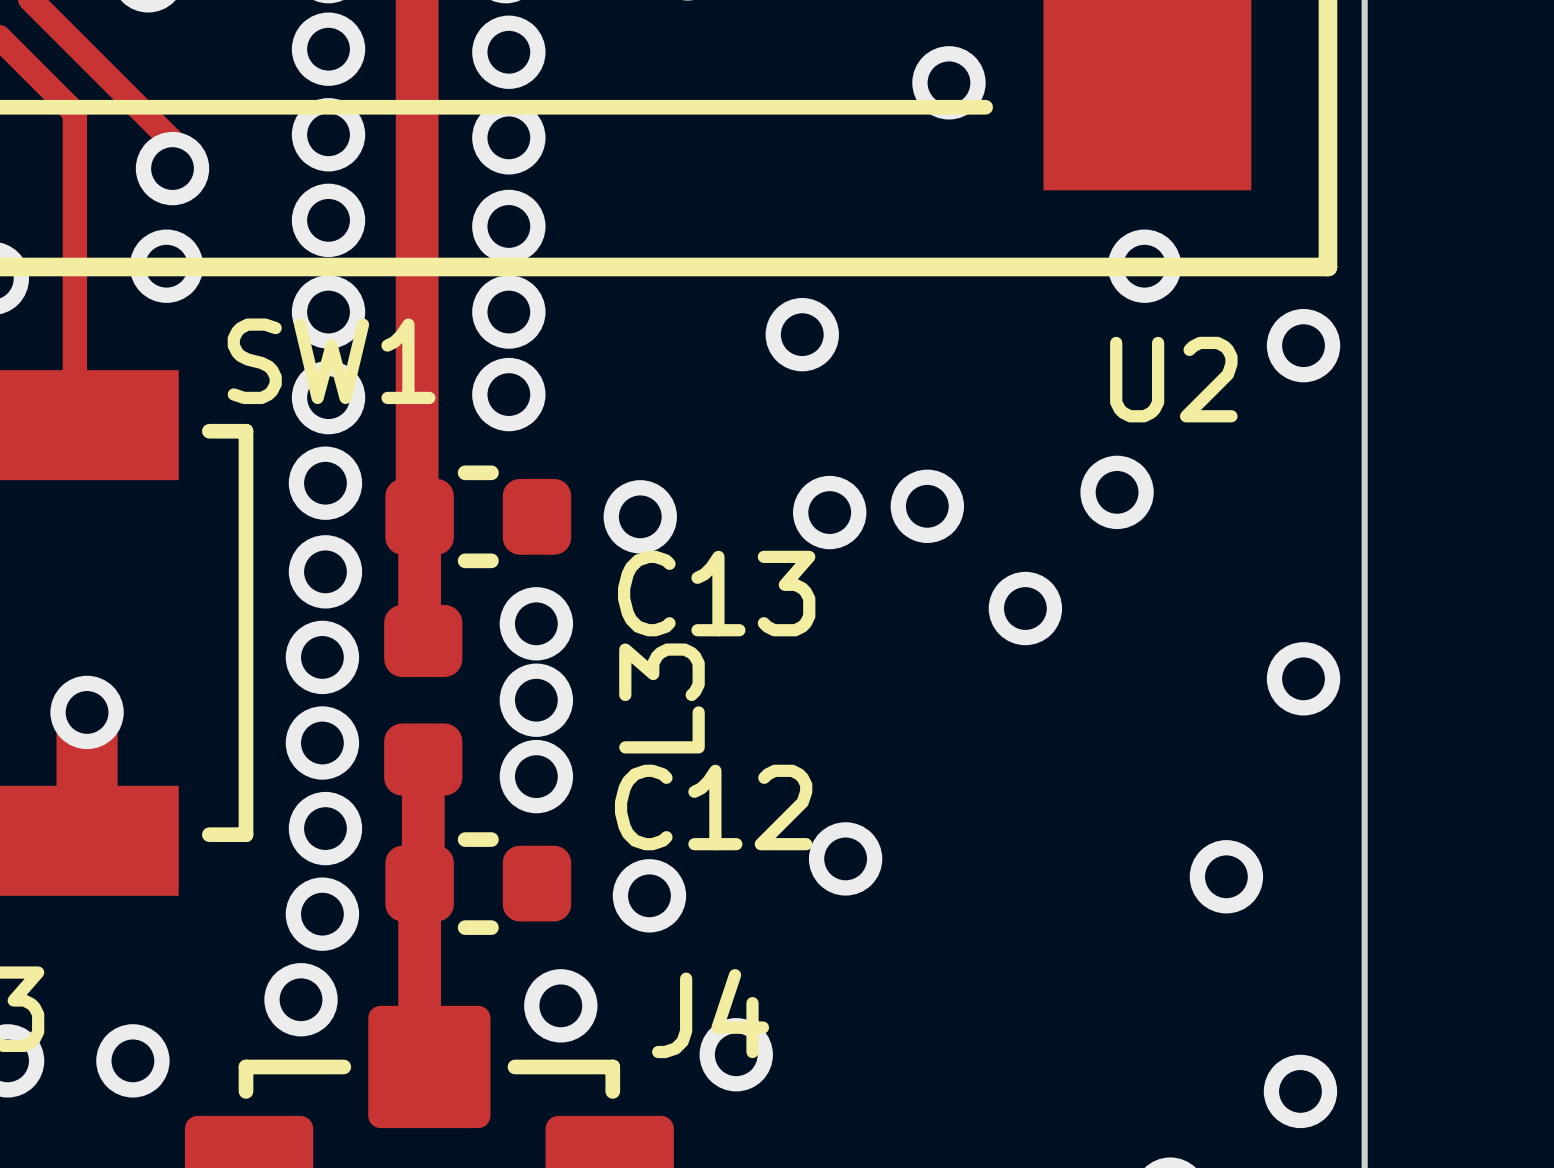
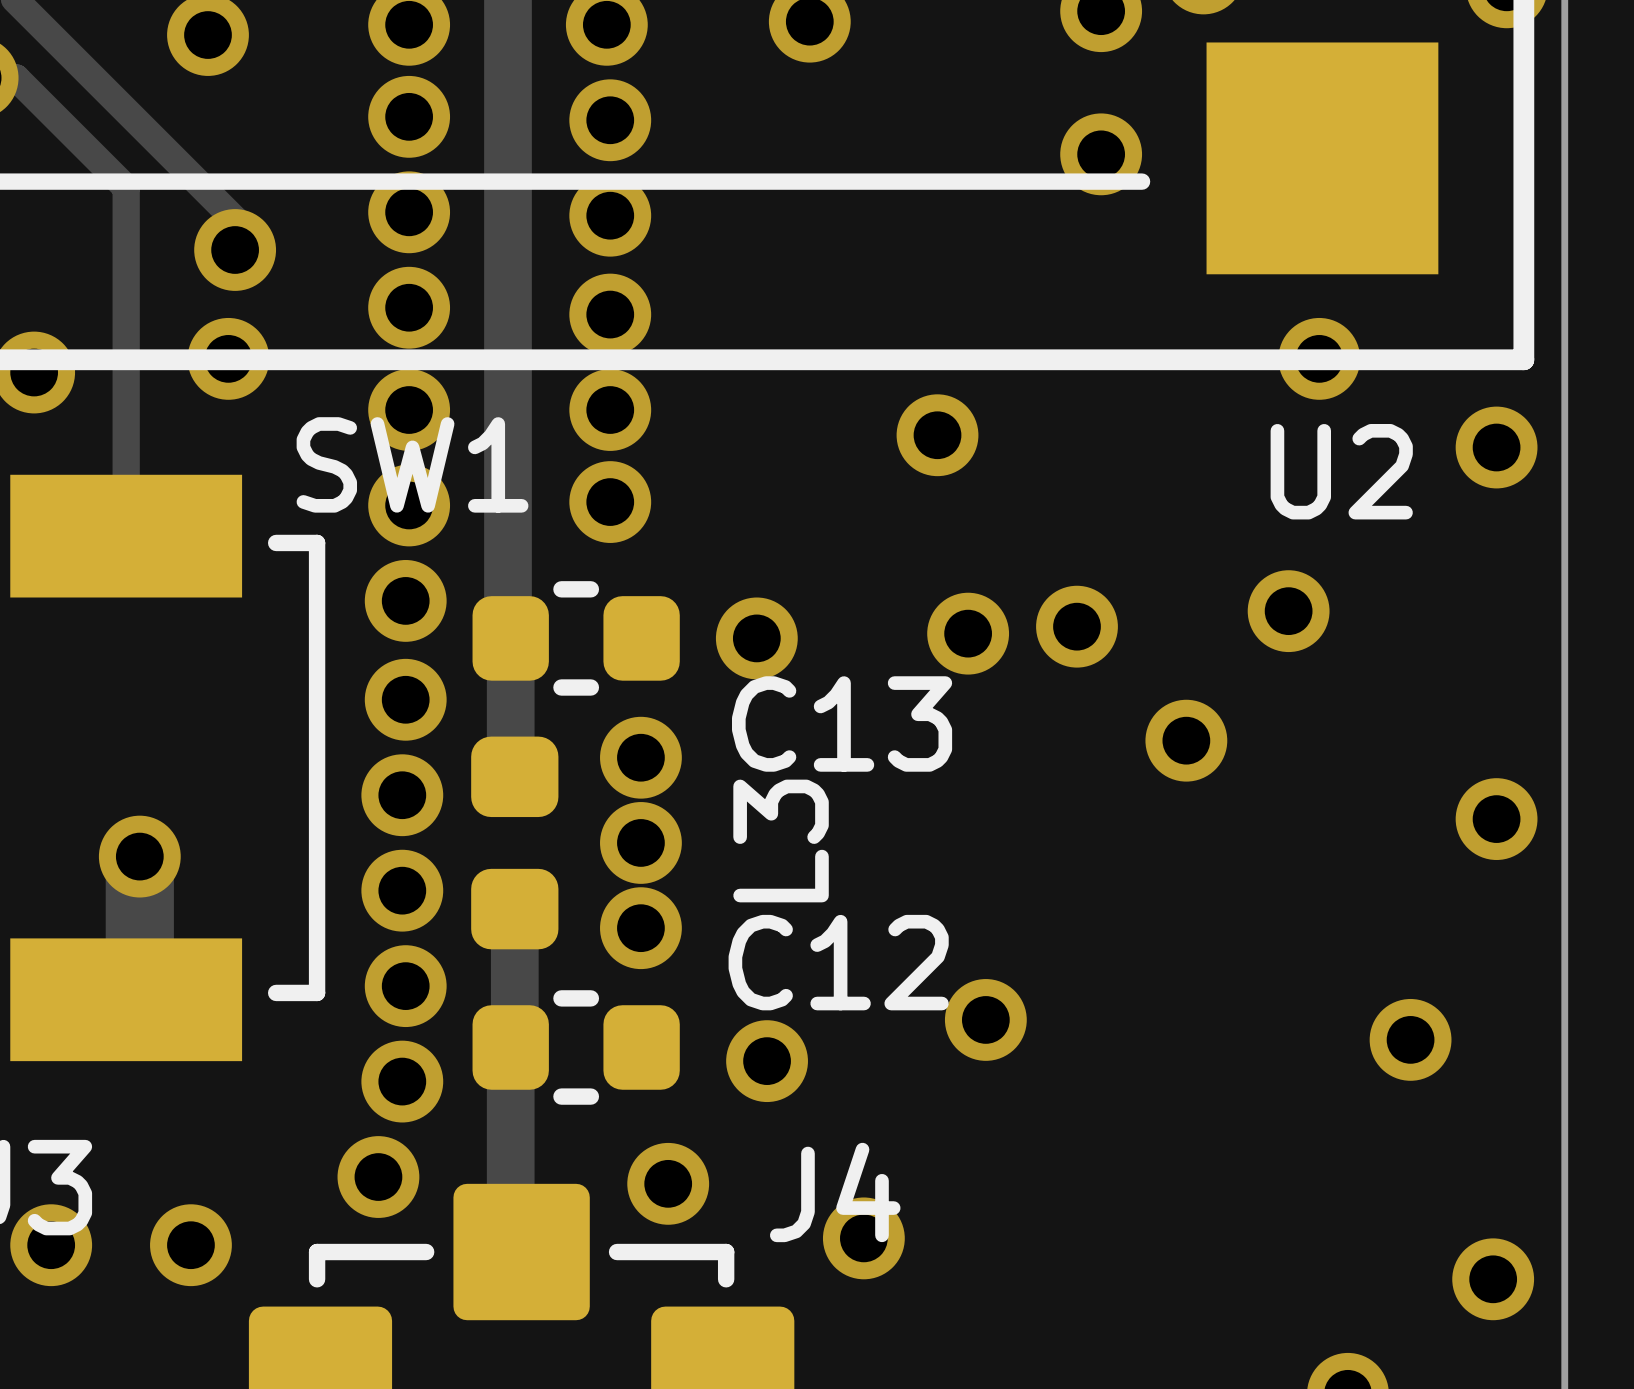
U2 name position: U2 (1173, 379) -> U2 (1341, 471)

